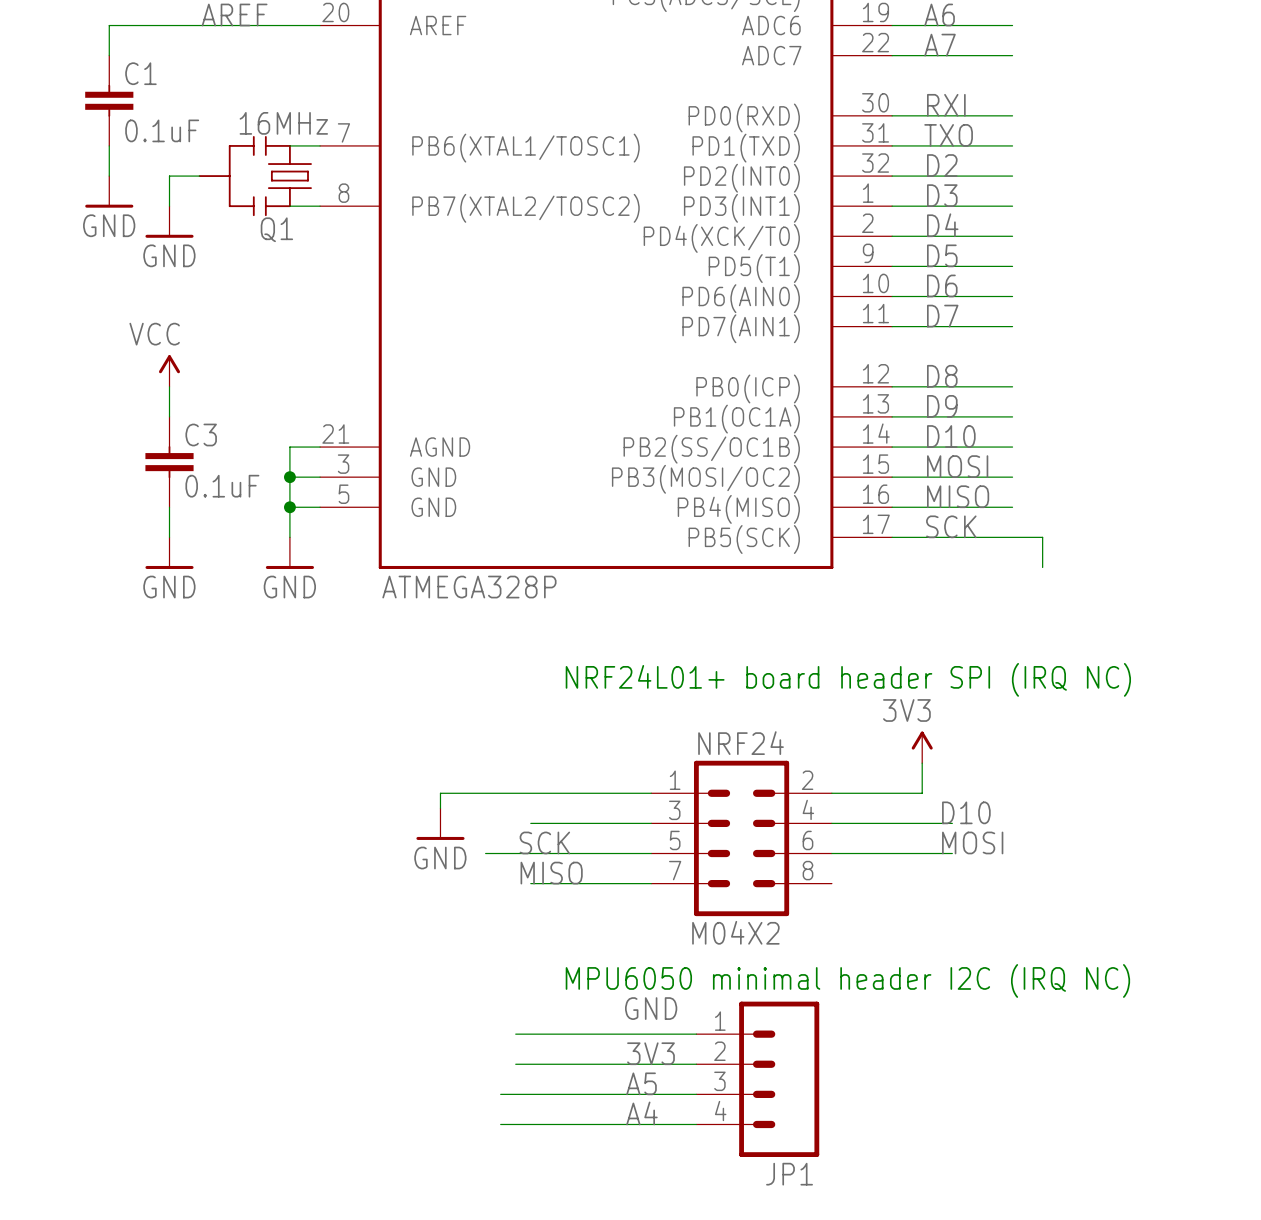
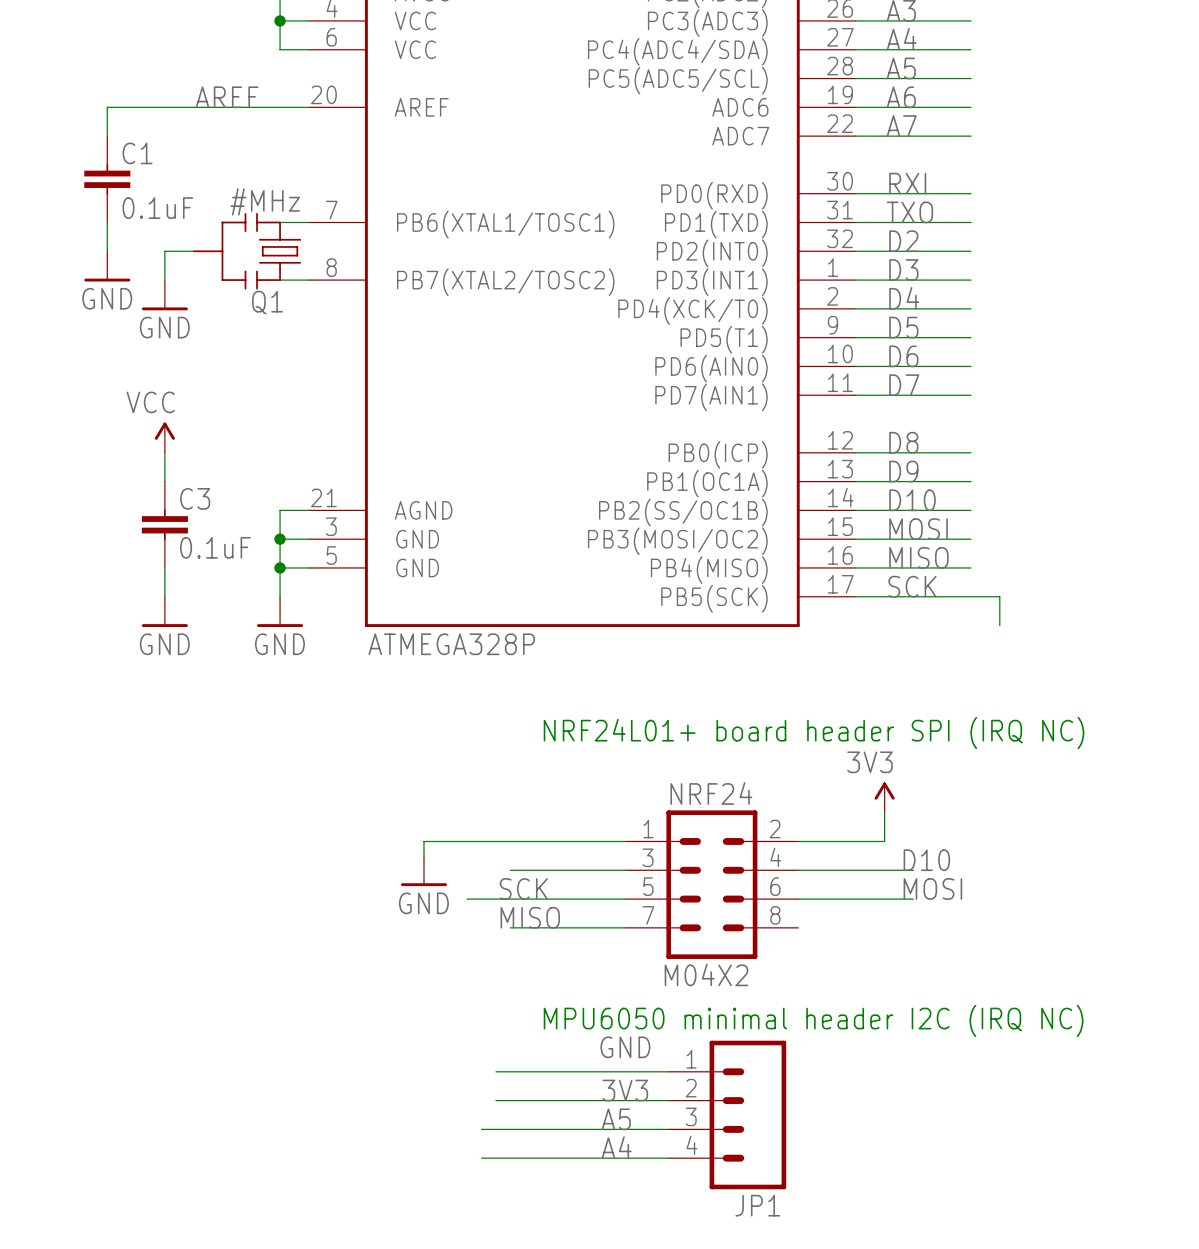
Q1 value: 16MHz (283, 123) -> #MHz (265, 201)

